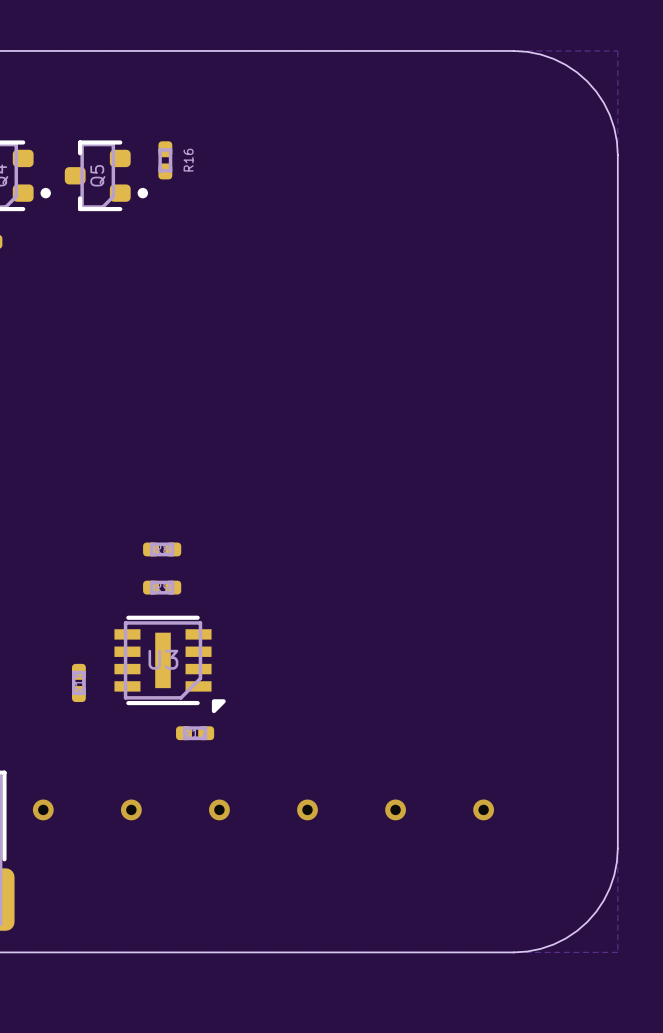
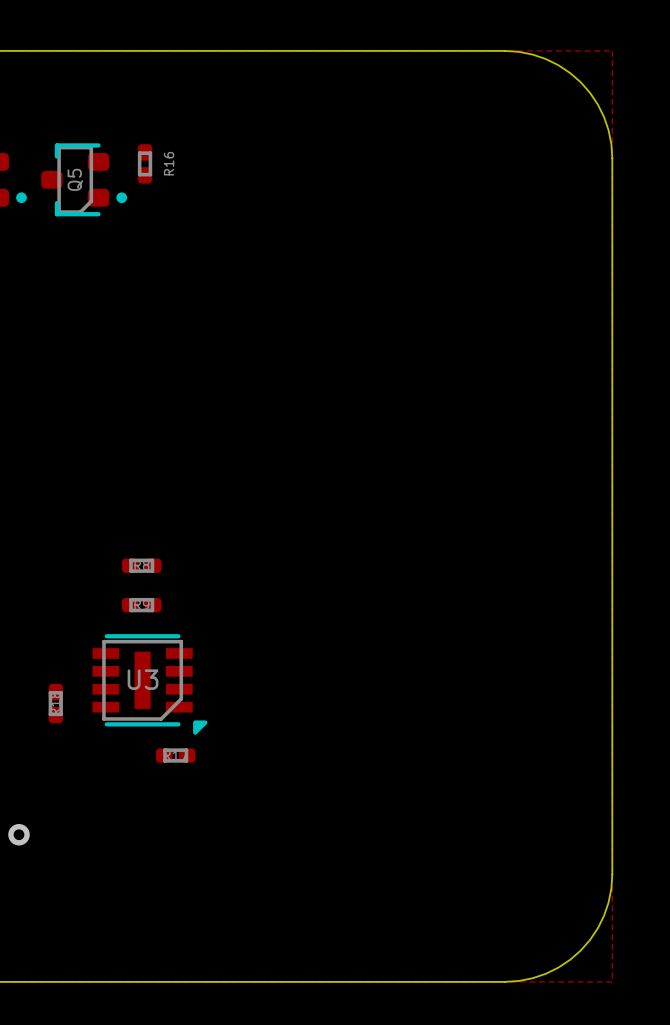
via: (131, 809) -> none
via: (219, 809) -> none
via: (307, 809) -> none
via: (395, 809) -> none
via: (483, 809) -> none

